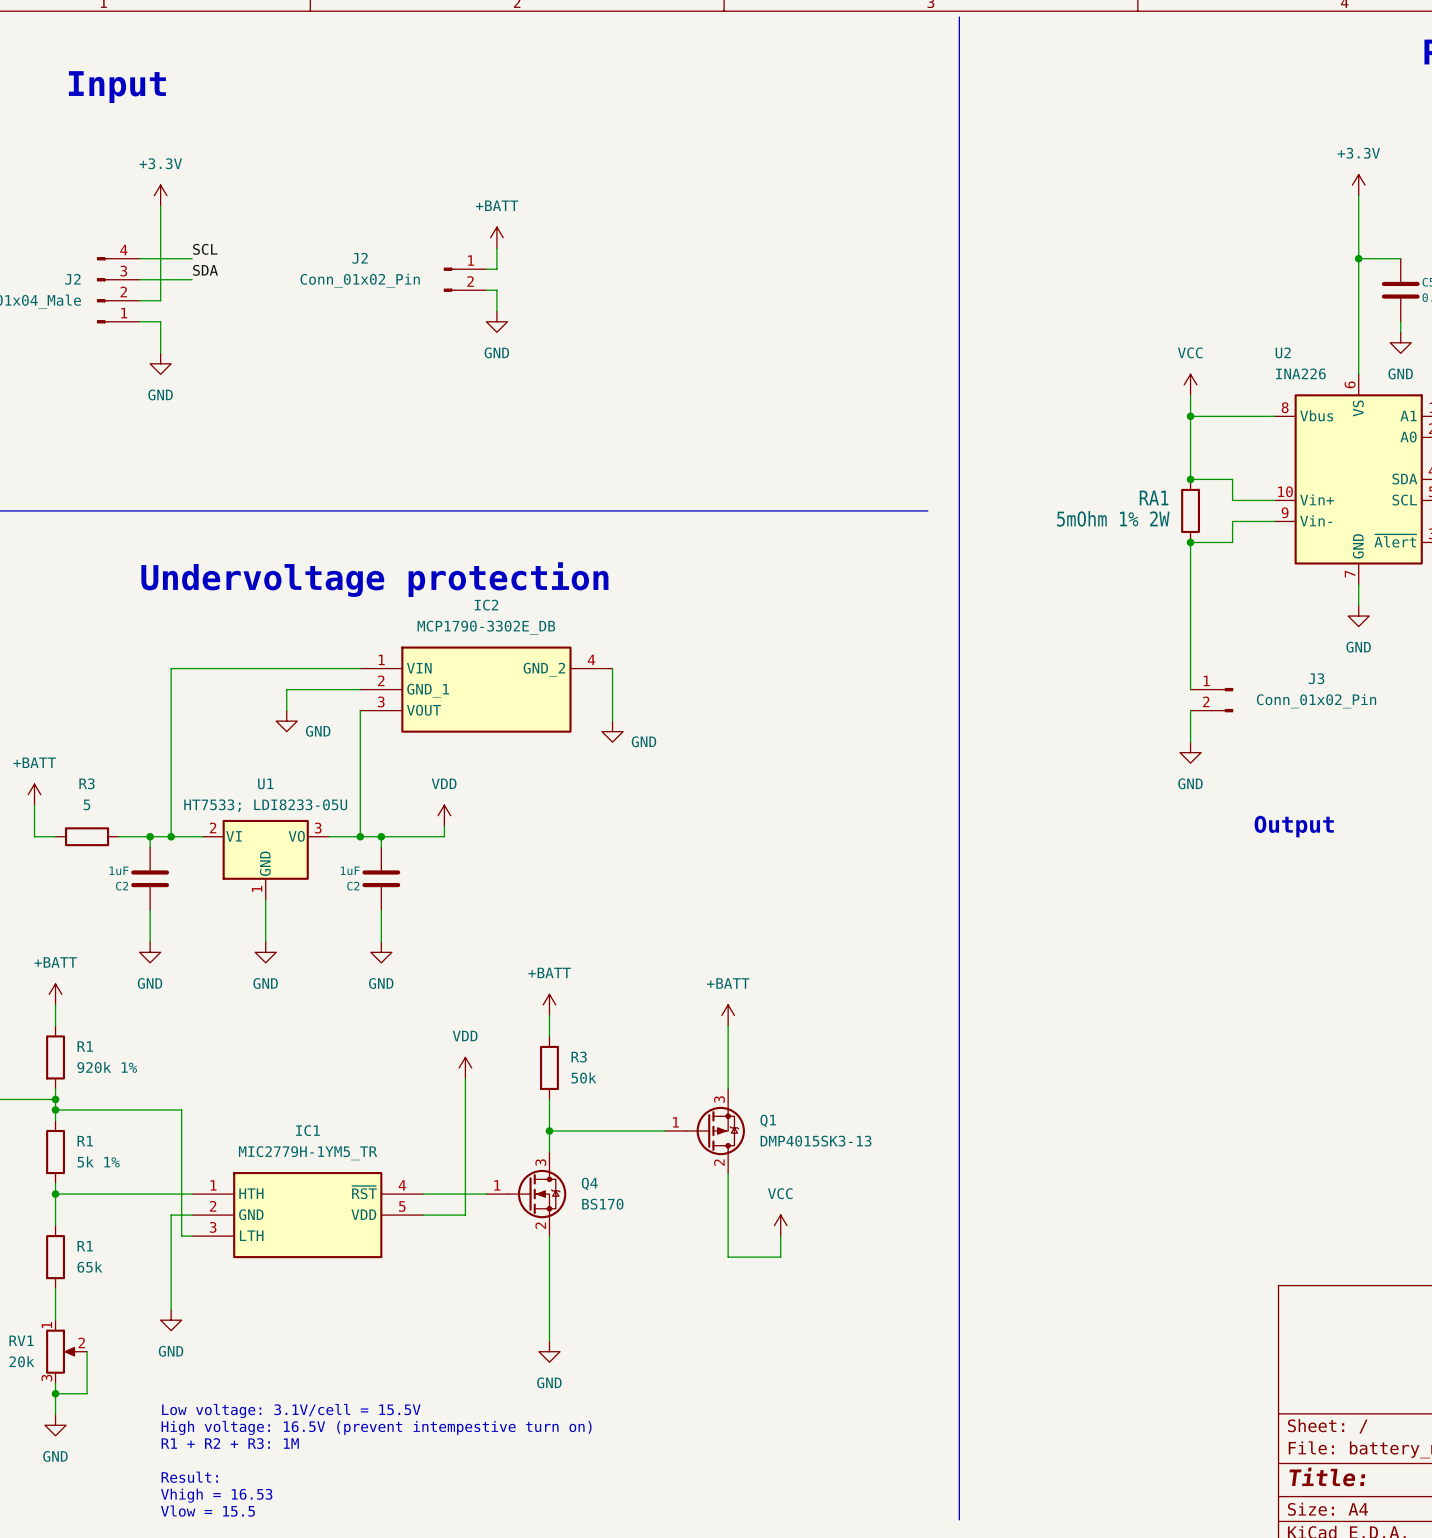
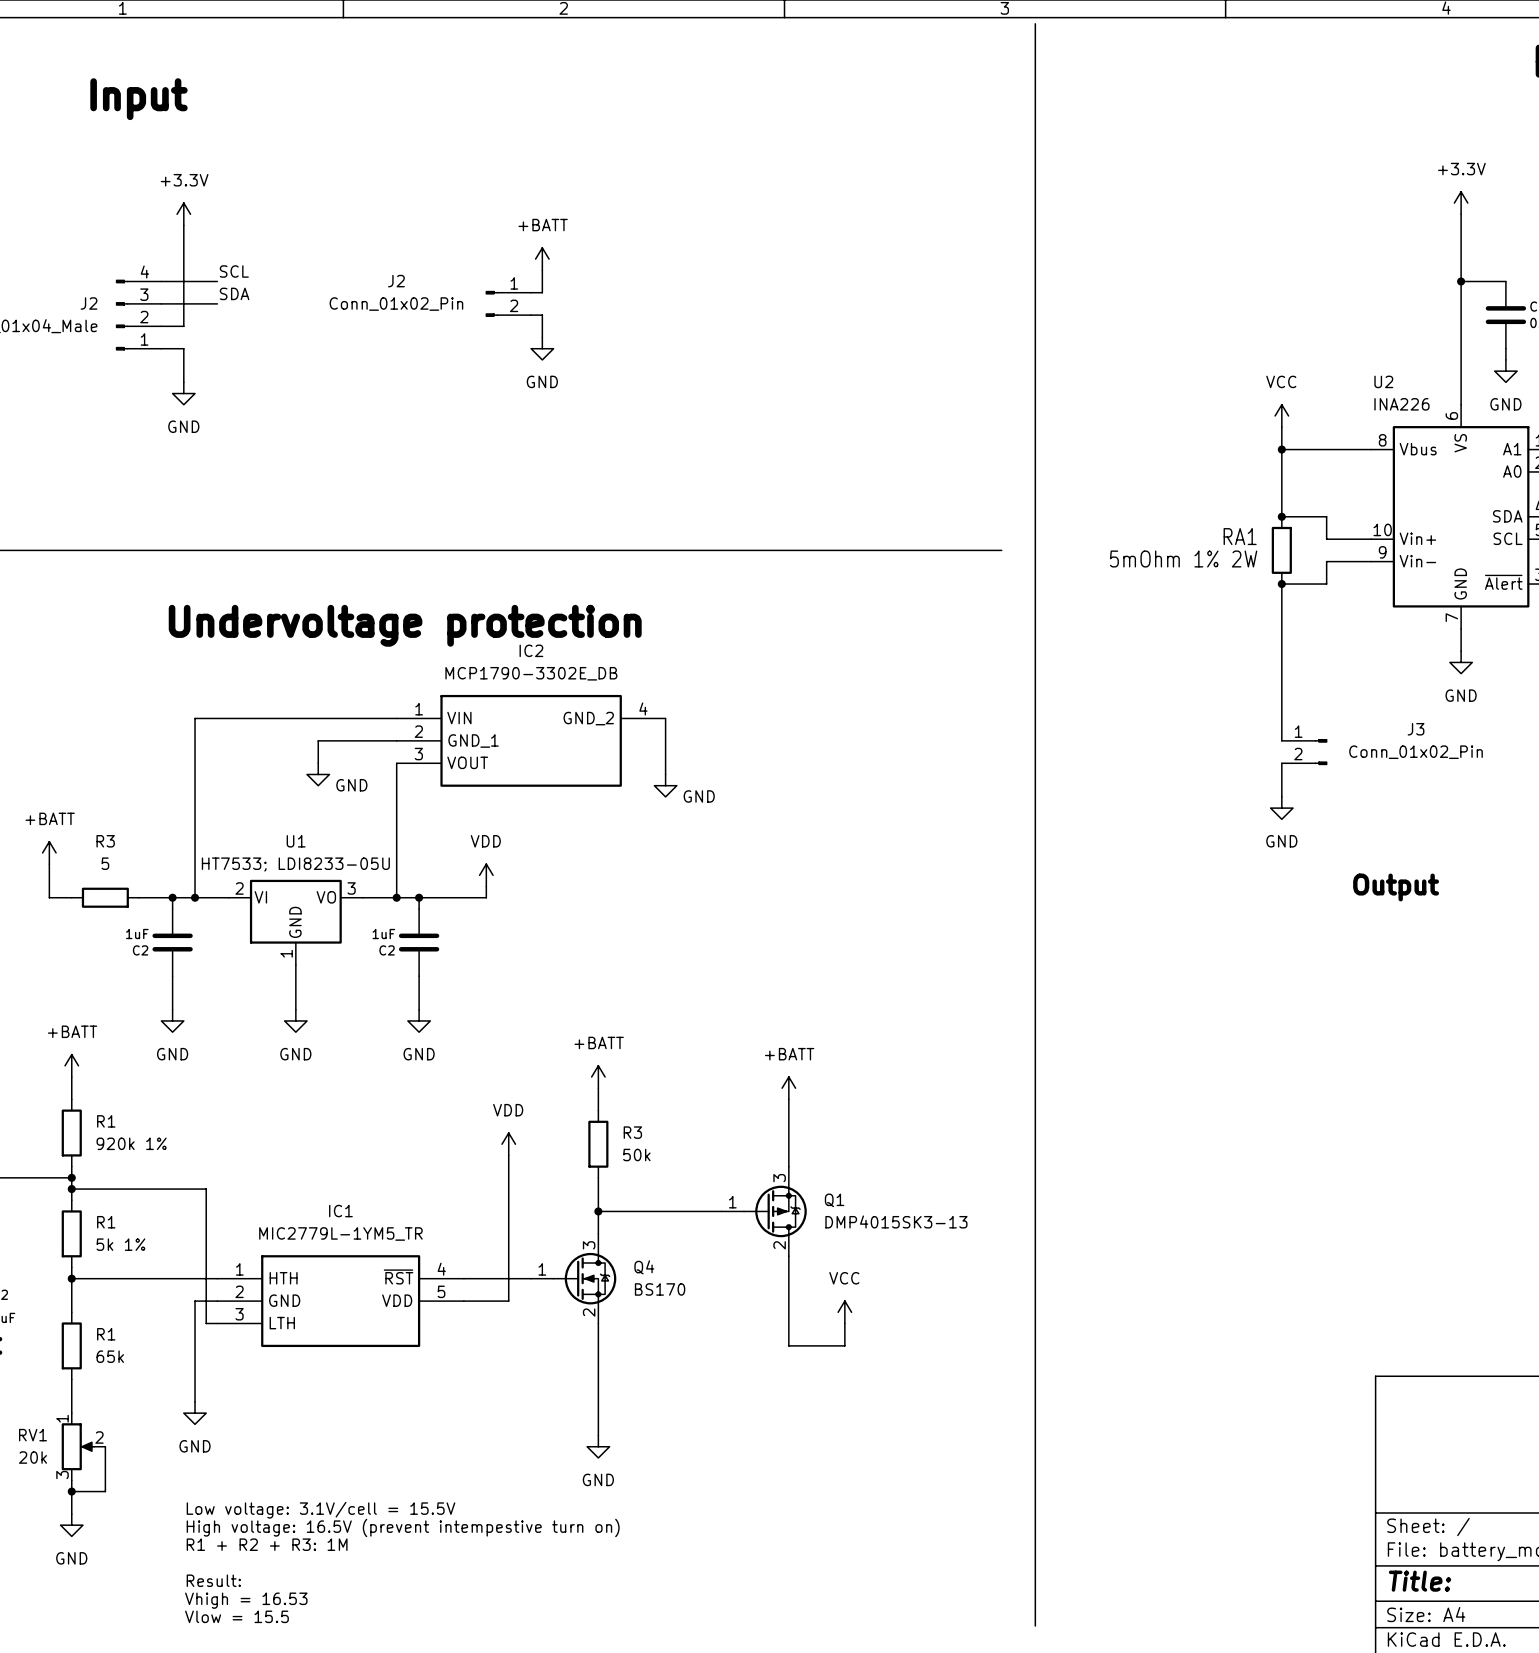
IC1 value: MIC2779H-1YM5_TR (308, 1153) -> MIC2779L-1YM5_TR (340, 1233)

